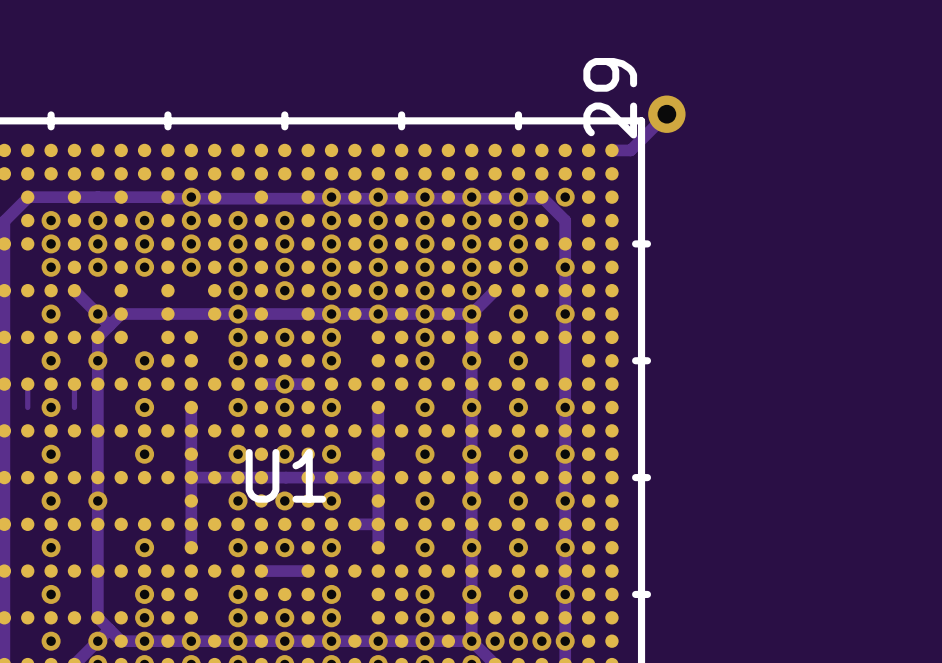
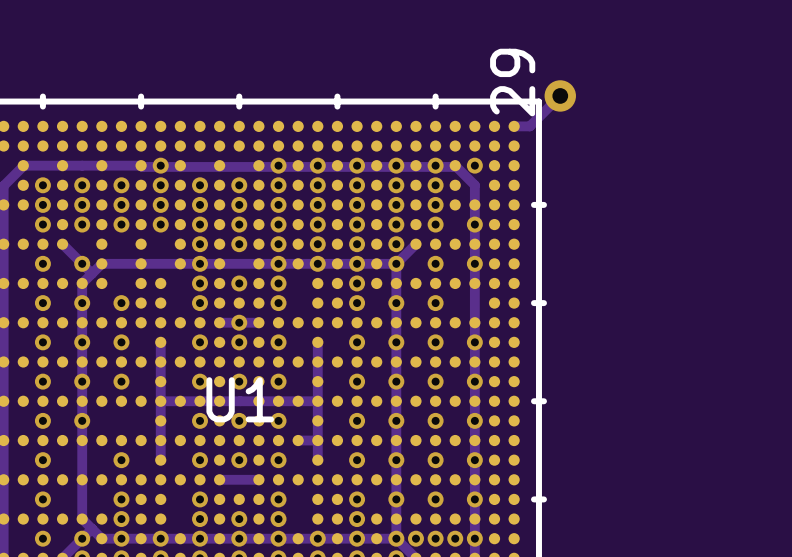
track: (27, 384) (27, 407) -> none
track: (74, 384) (74, 407) -> none
via: none -> (82, 342)
via: none -> (82, 381)

